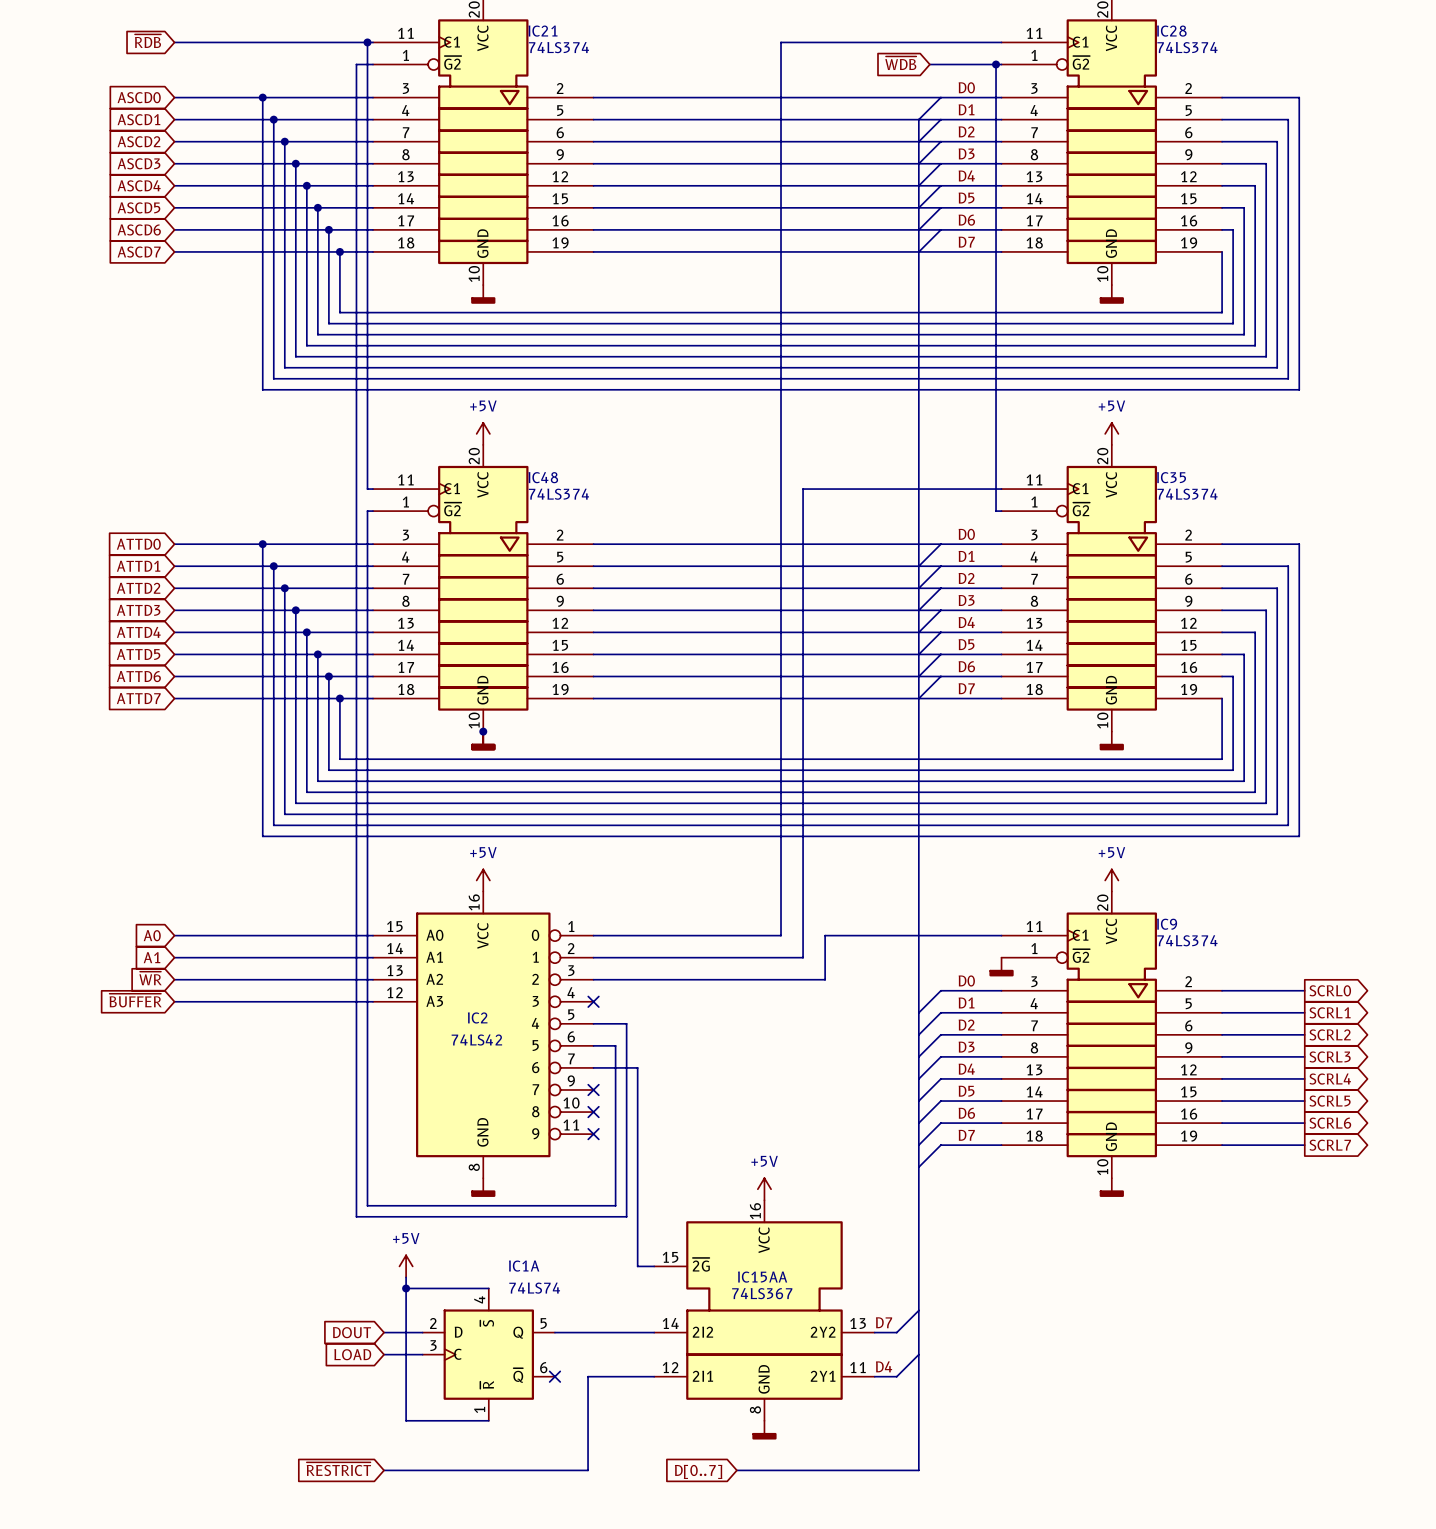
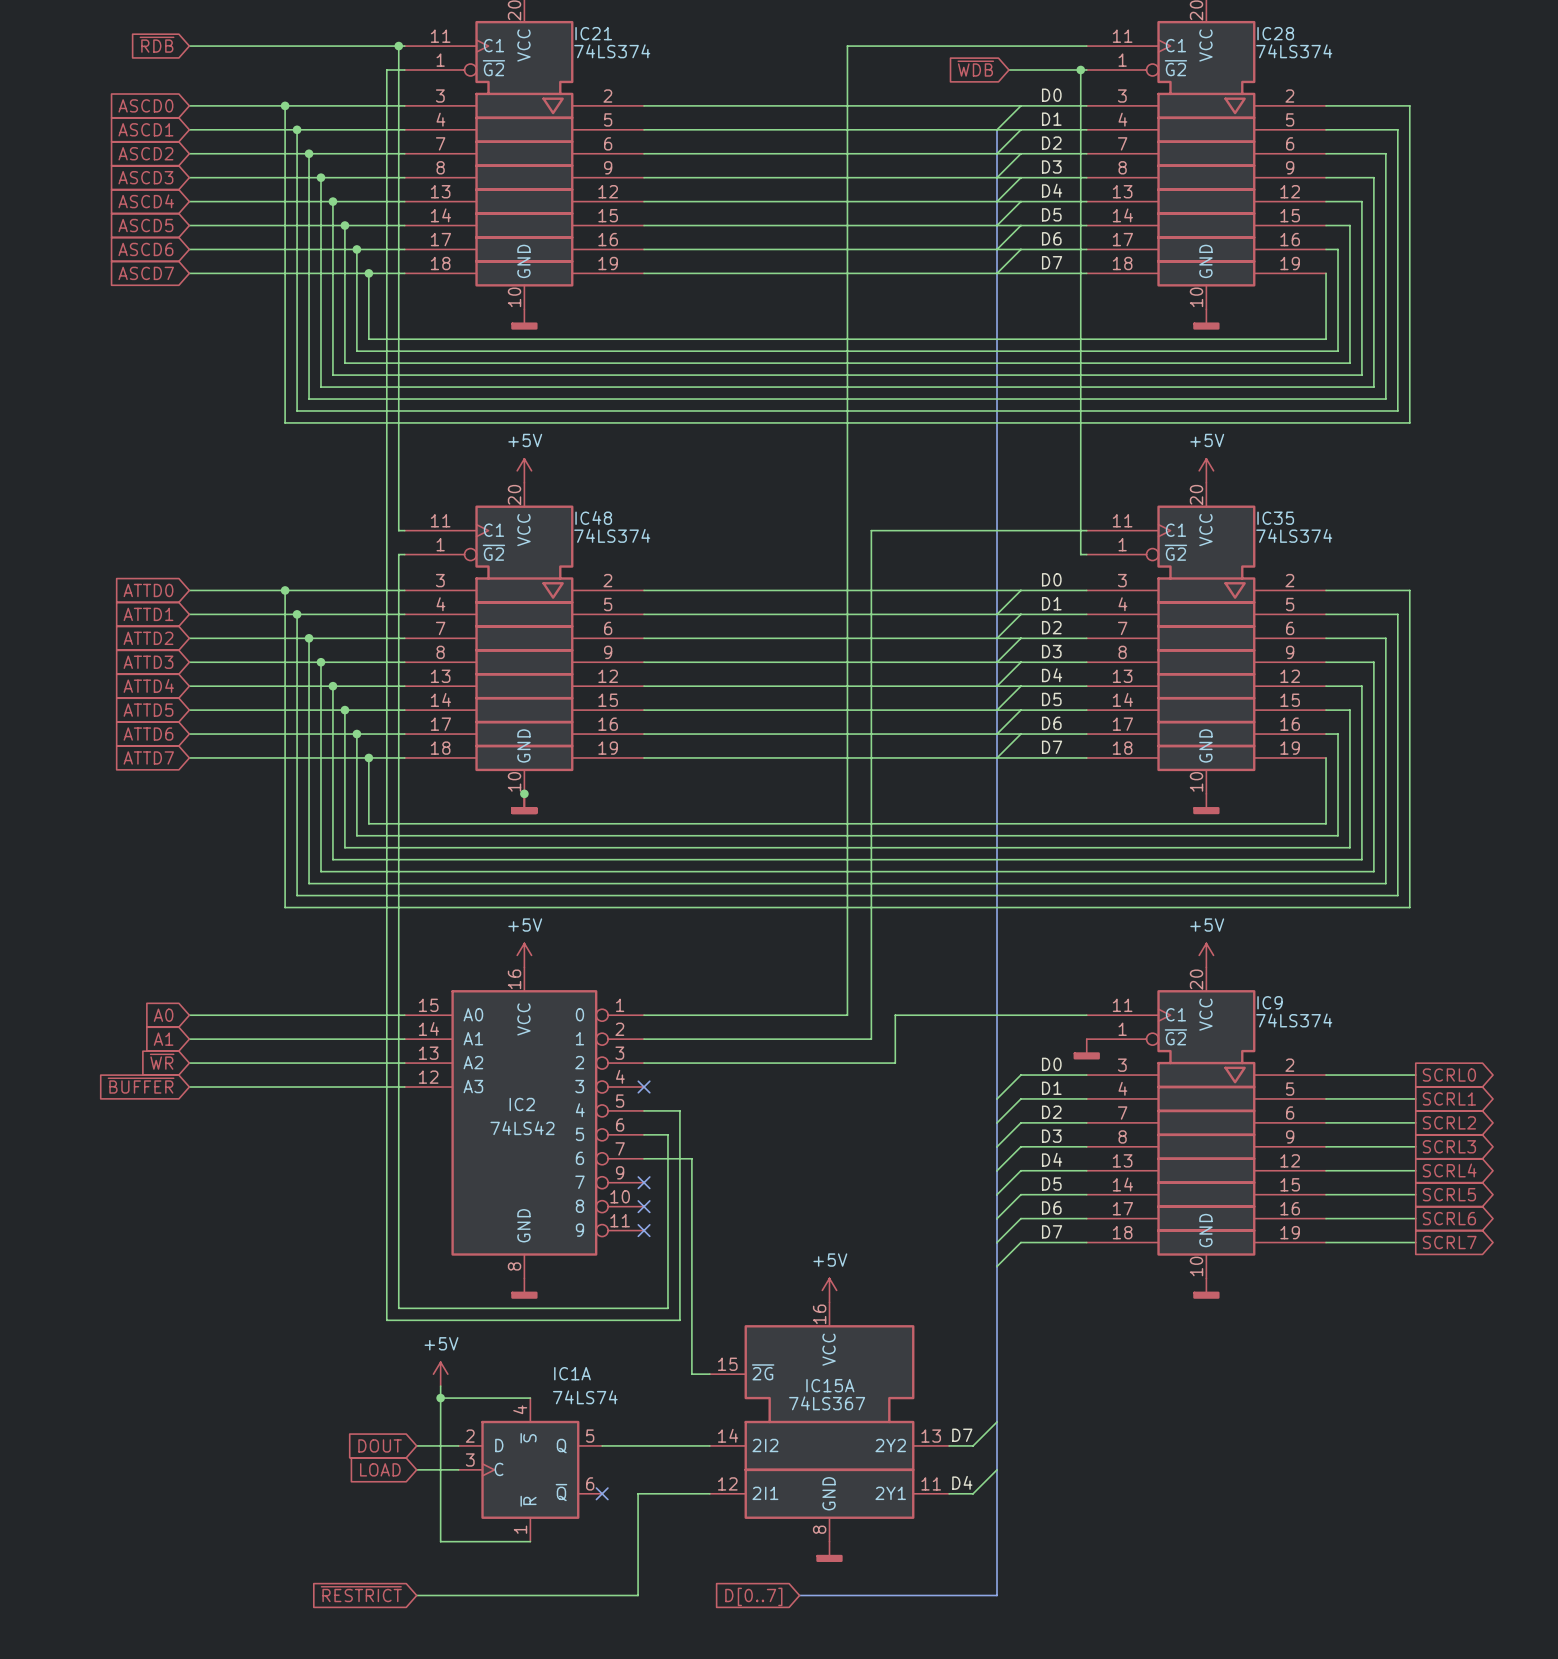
IC15AA name: IC15AA (762, 1277) -> IC15A (830, 1385)

